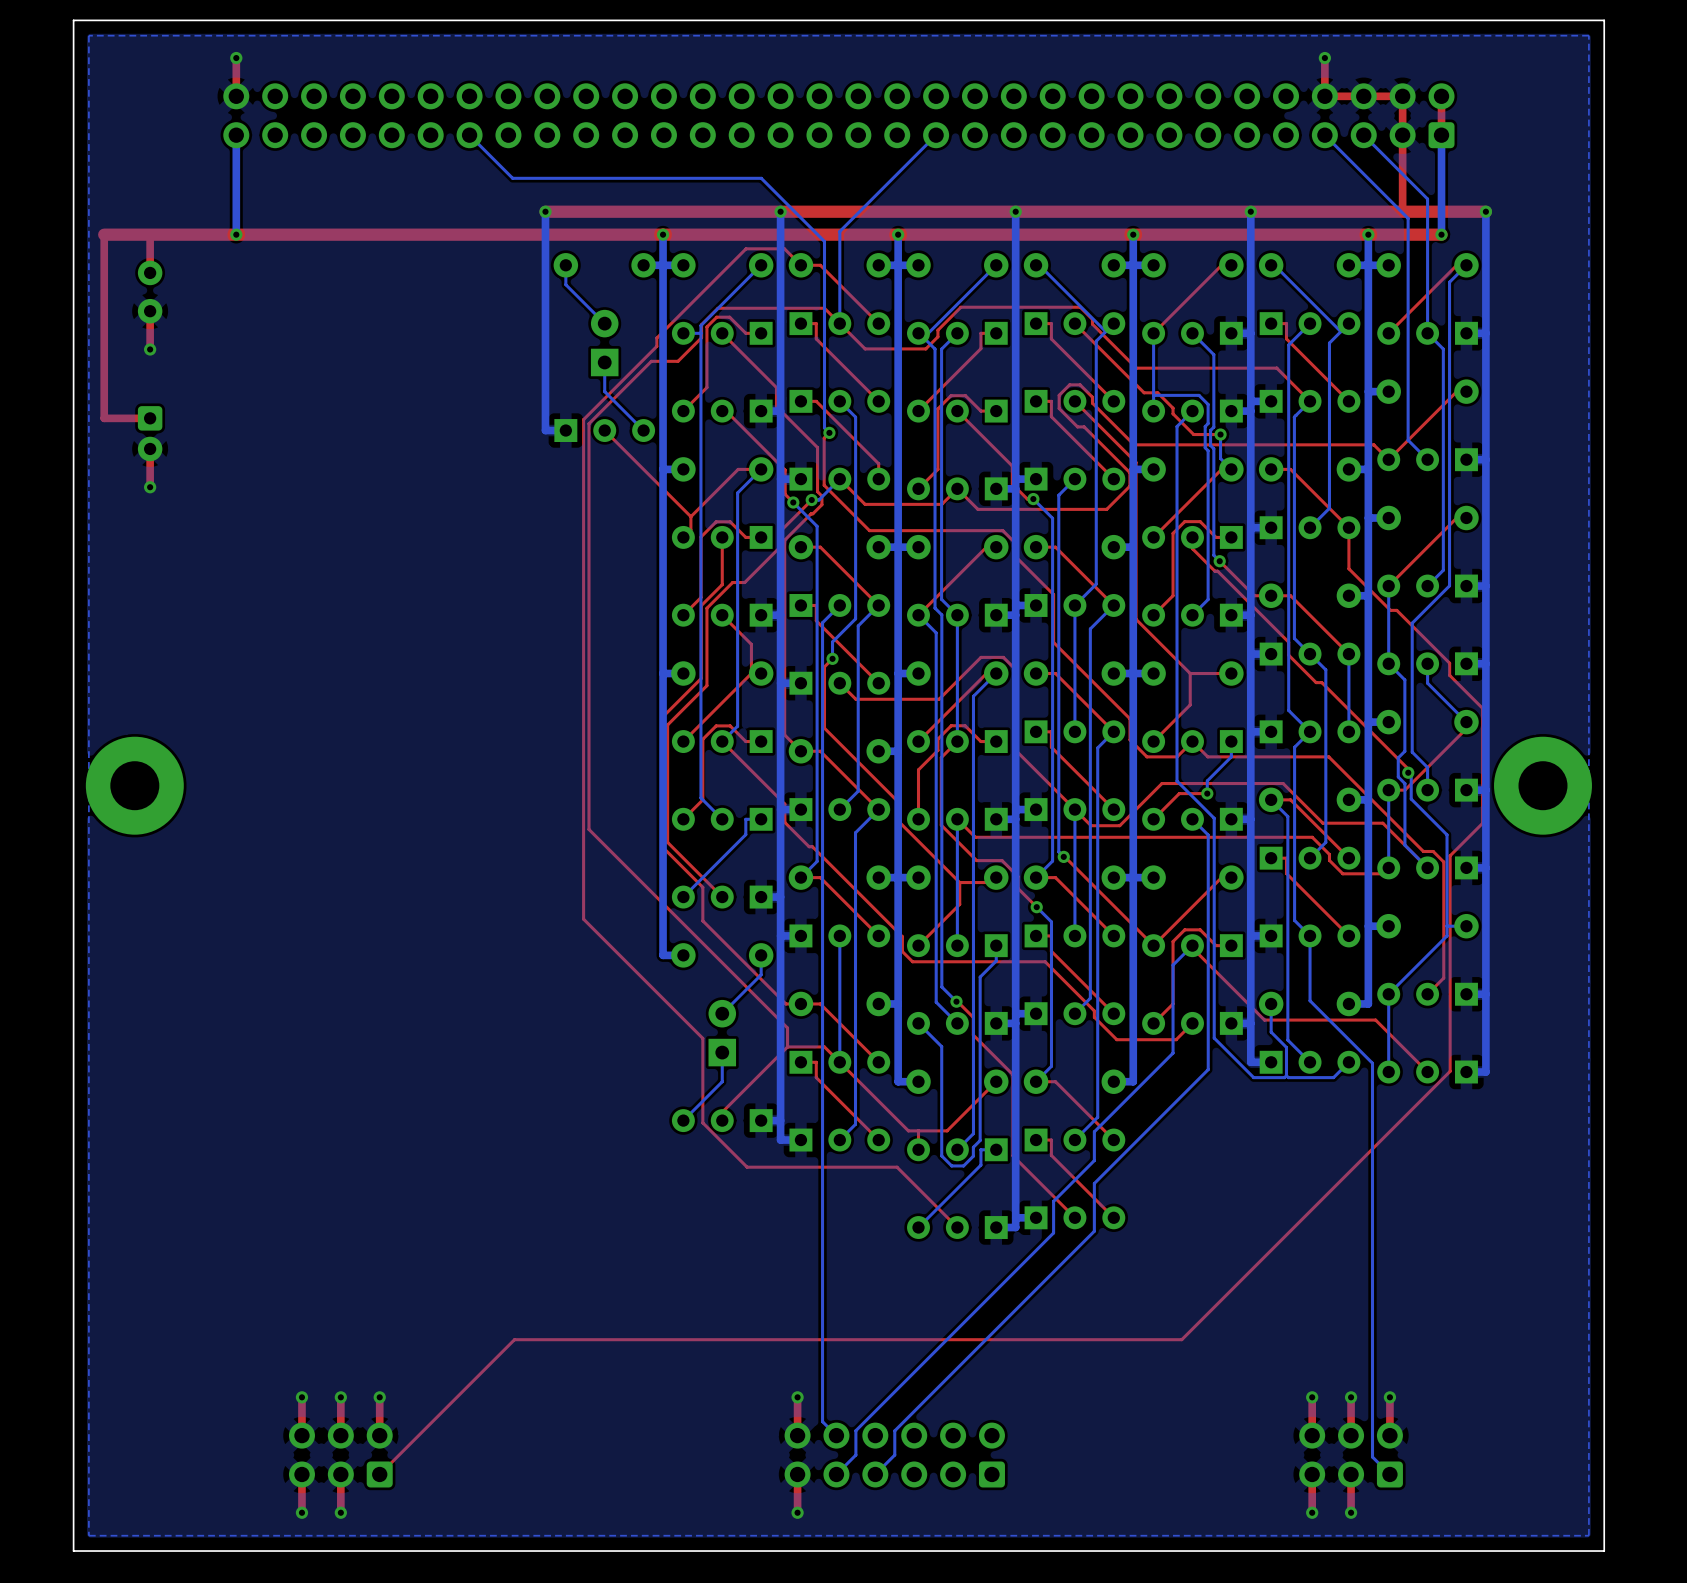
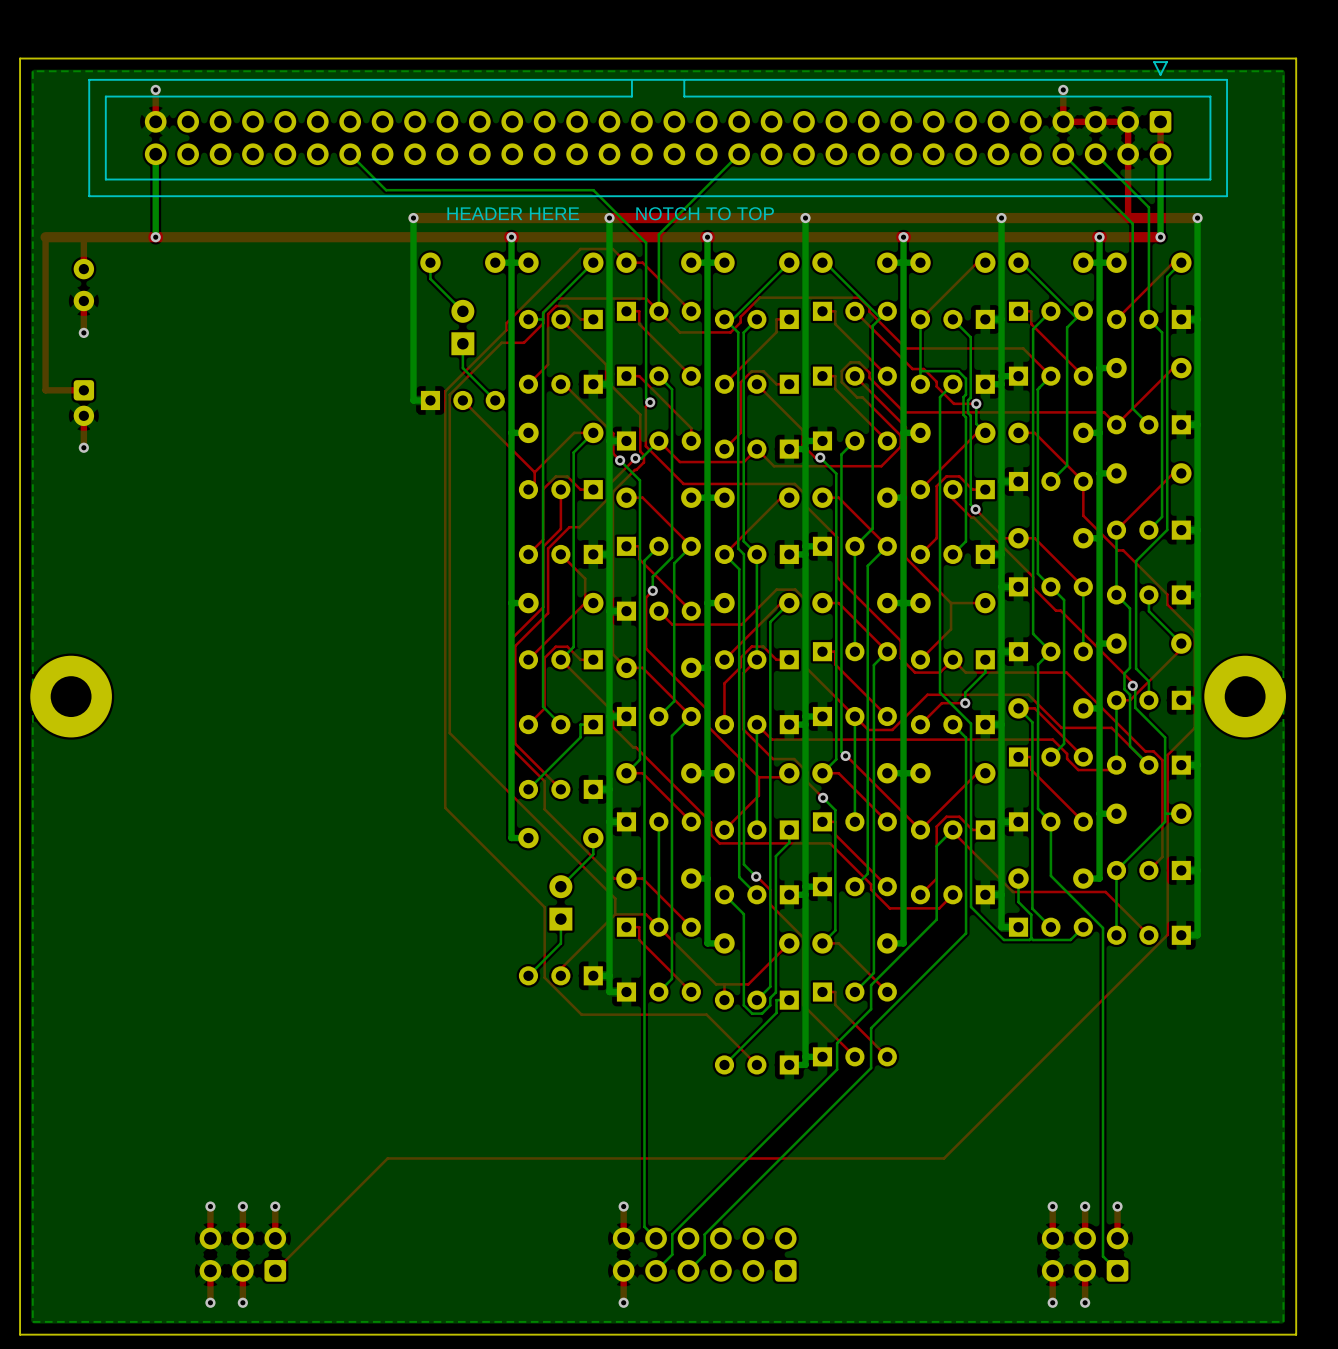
part side: top (838, 115) -> bottom (658, 129)
text: none -> HEADER HERE (513, 213)
text: none -> NOTCH TO TOP (705, 213)

